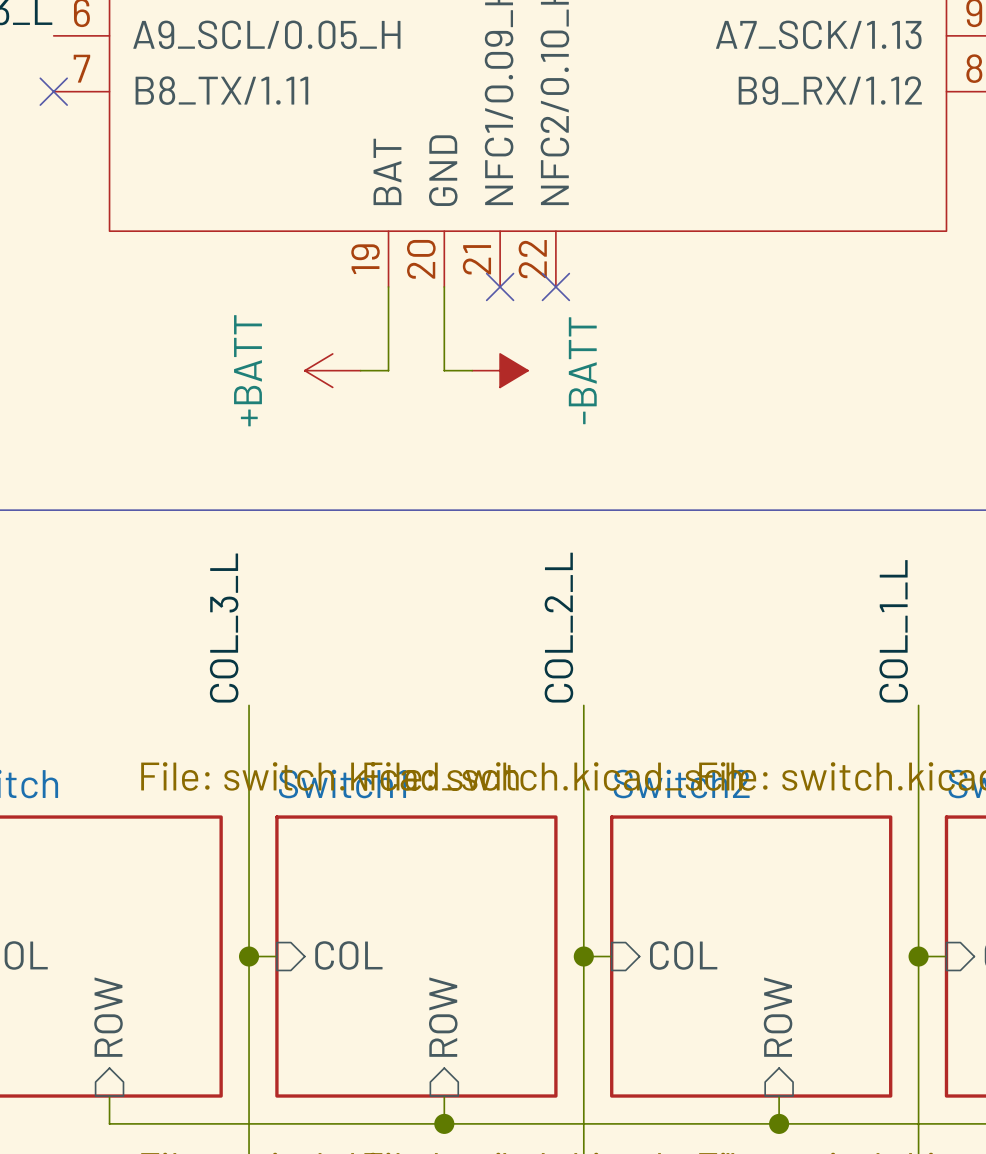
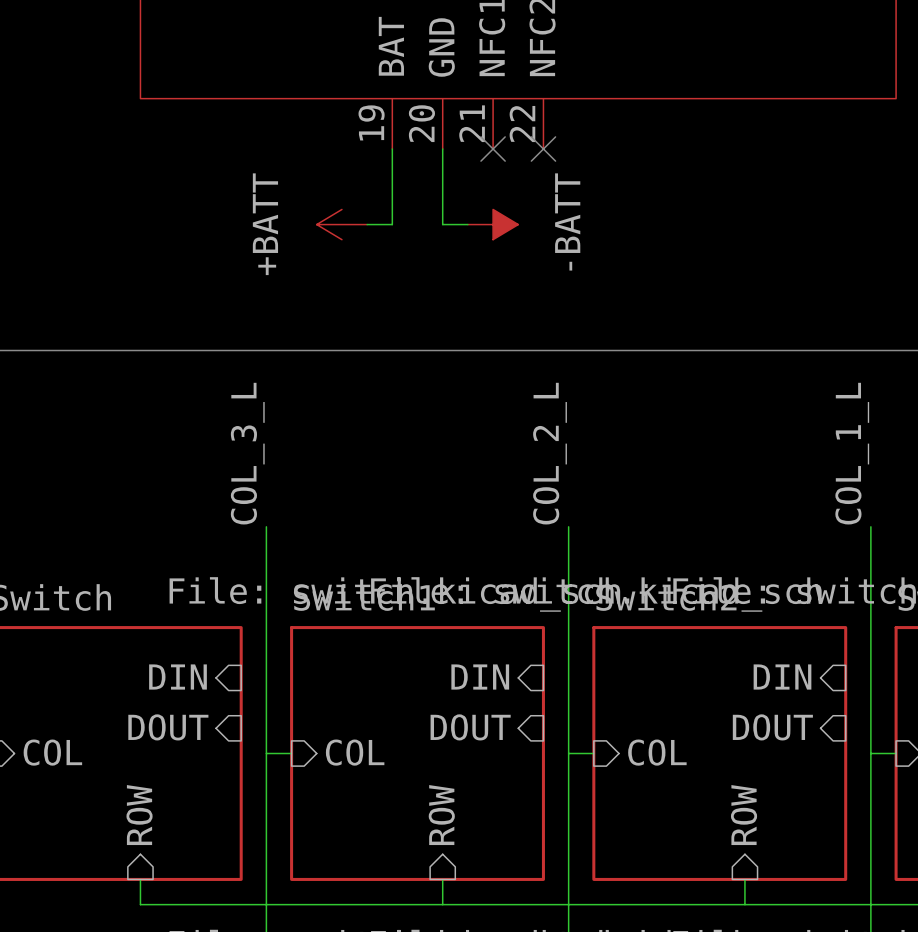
sheet pin: none -> DIN (178, 677)
sheet pin: none -> DIN (480, 677)
sheet pin: none -> DIN (782, 677)
sheet pin: none -> DOUT (168, 727)
sheet pin: none -> DOUT (470, 727)
sheet pin: none -> DOUT (772, 727)
junction: (249, 956) -> none
junction: (583, 956) -> none
junction: (918, 956) -> none
junction: (444, 1123) -> none
junction: (779, 1123) -> none

